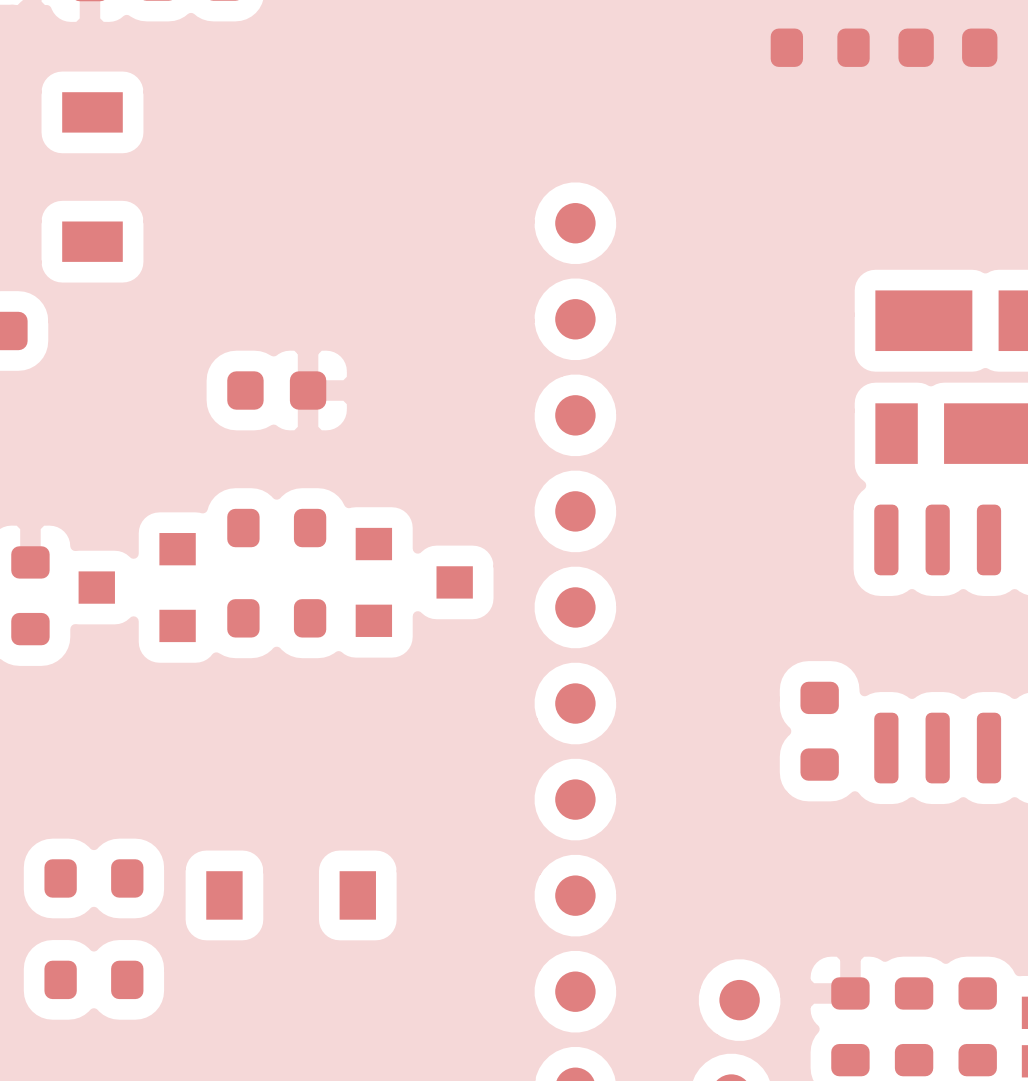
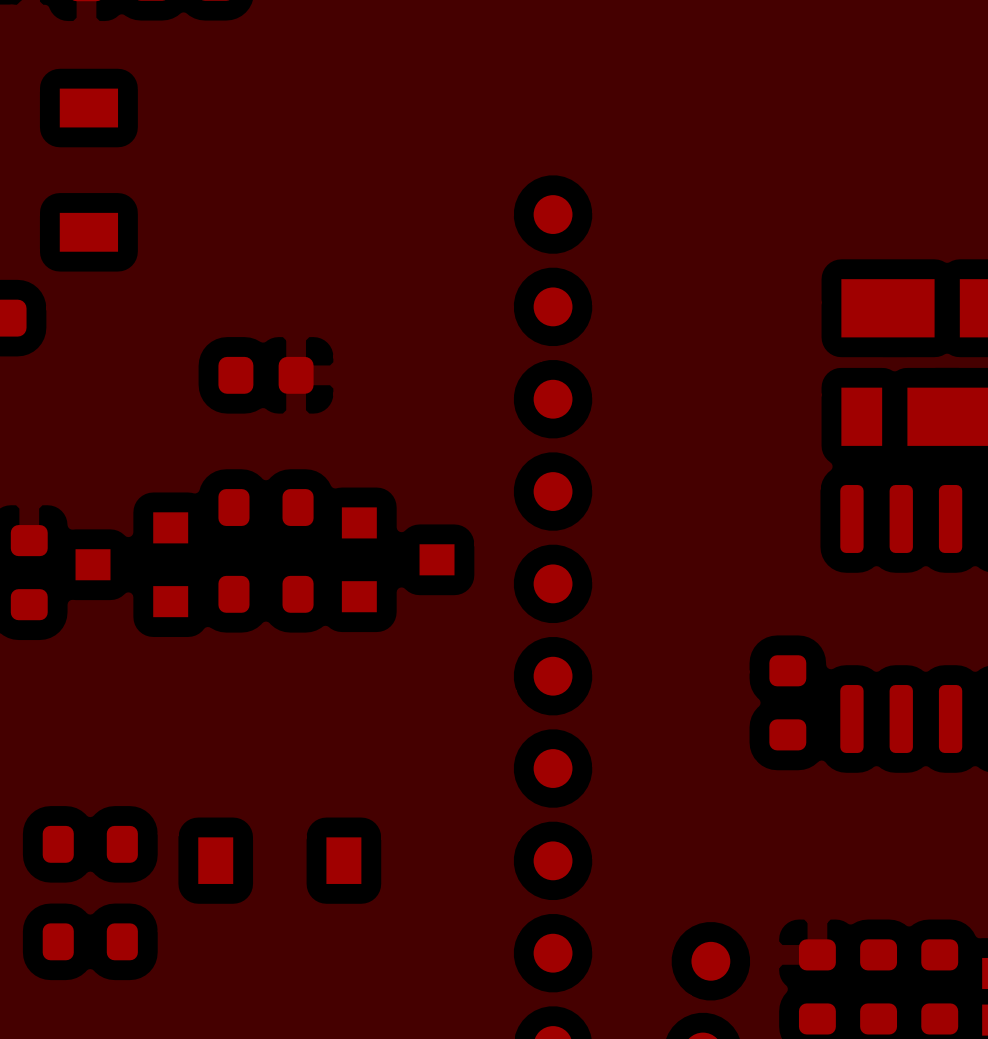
part: (820, 47) -> none
part: (947, 47) -> none

